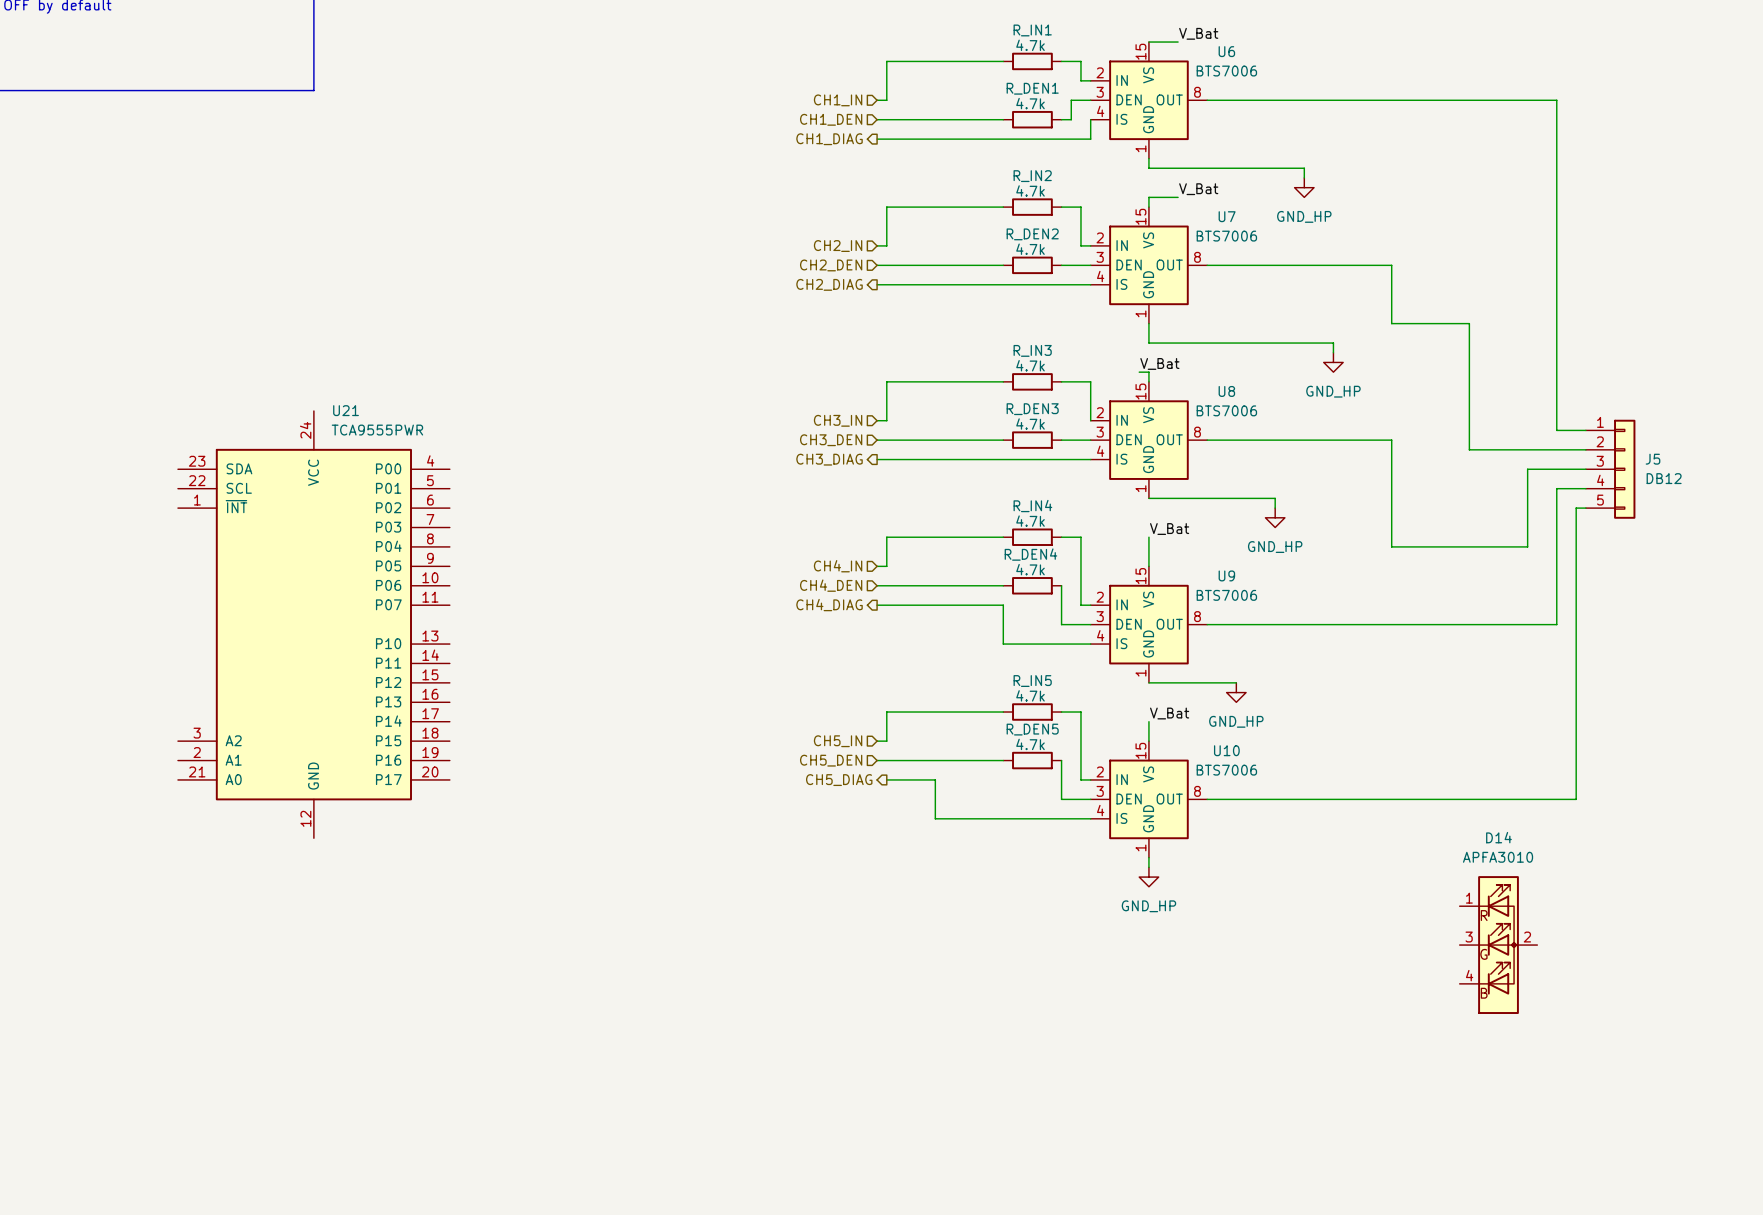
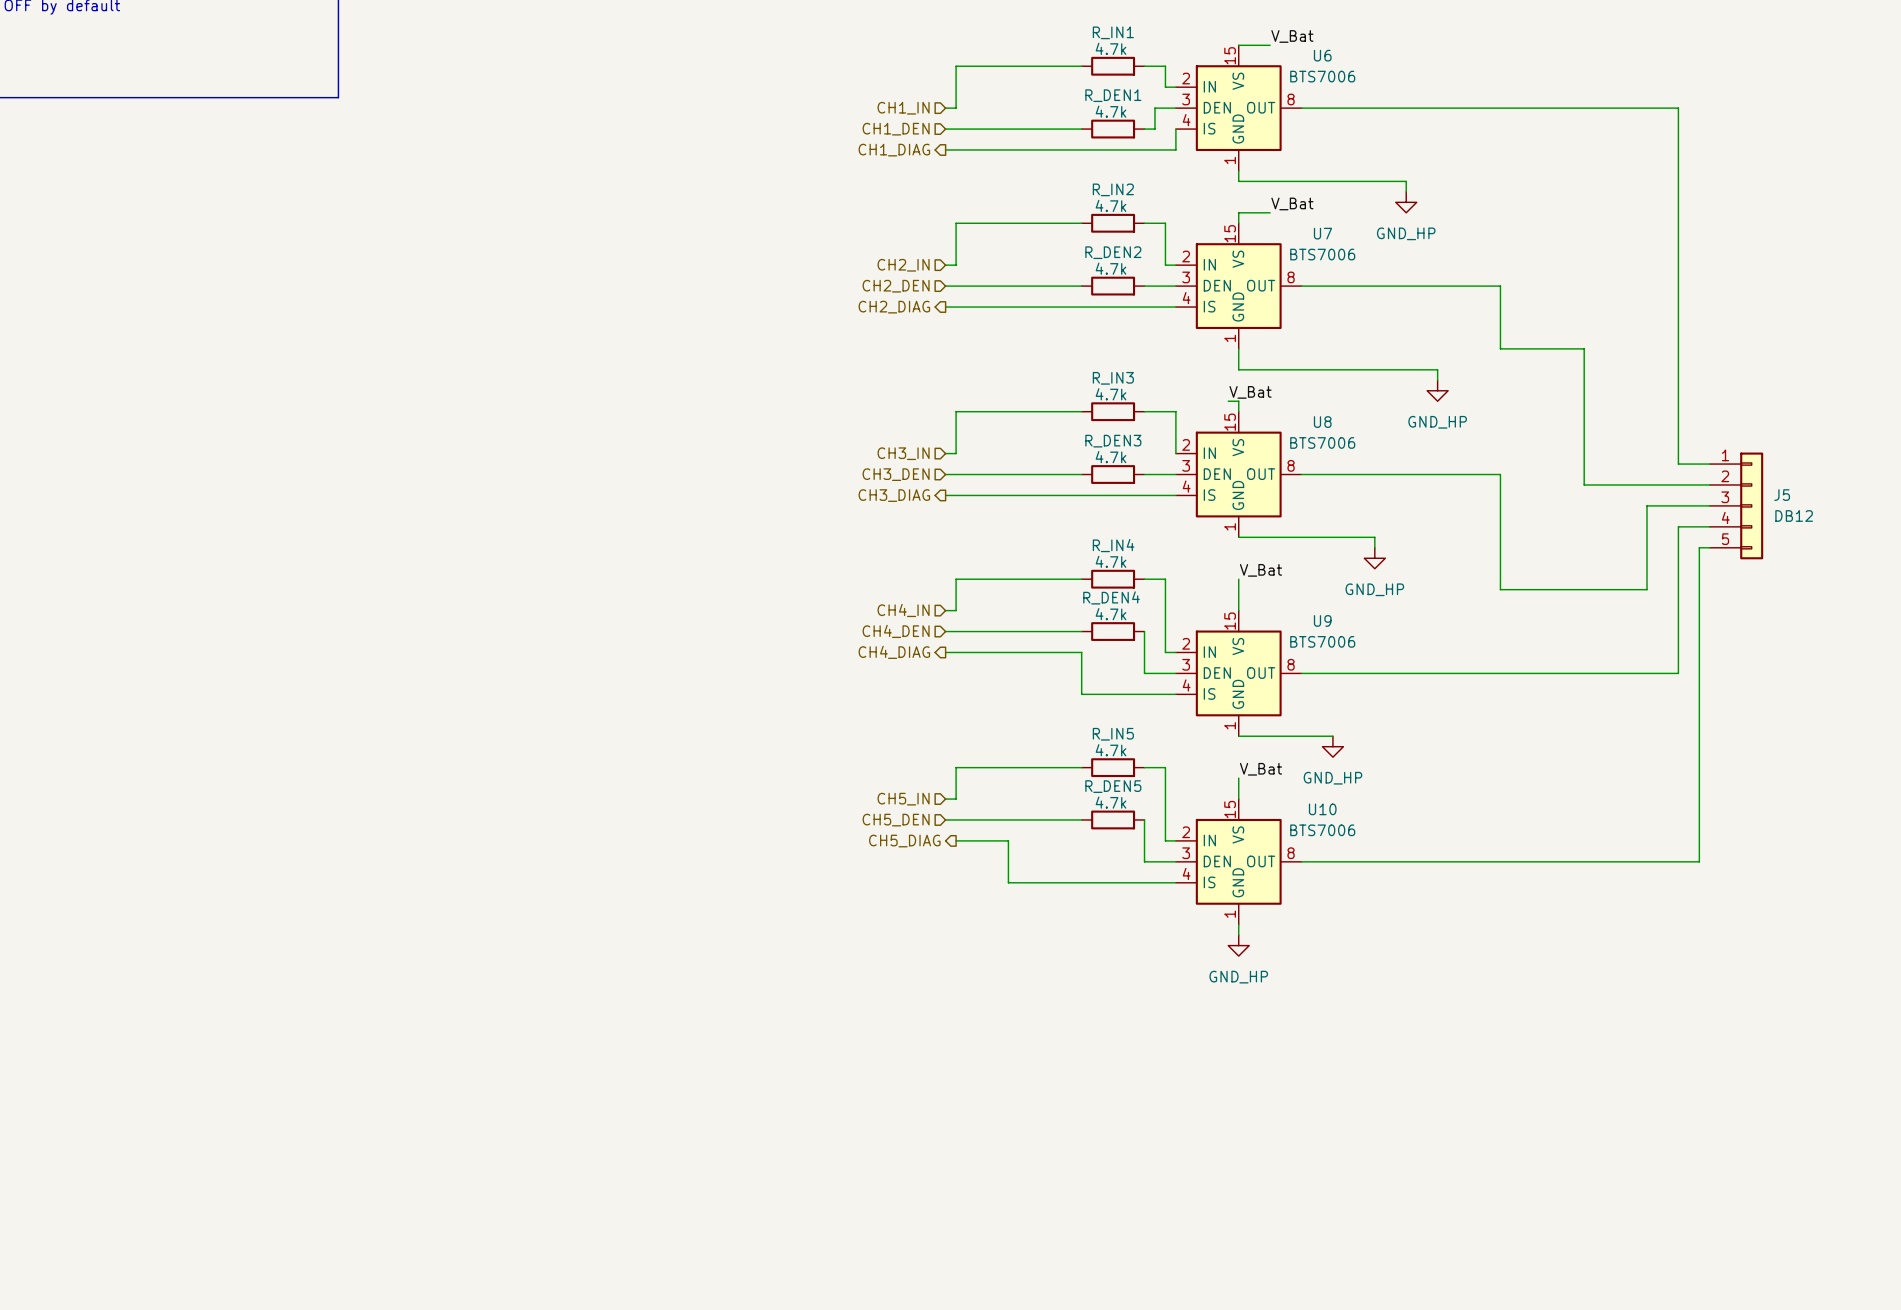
U21: TCA9555PWR (313, 624) -> none
D14: APFA3010 (1498, 945) -> none

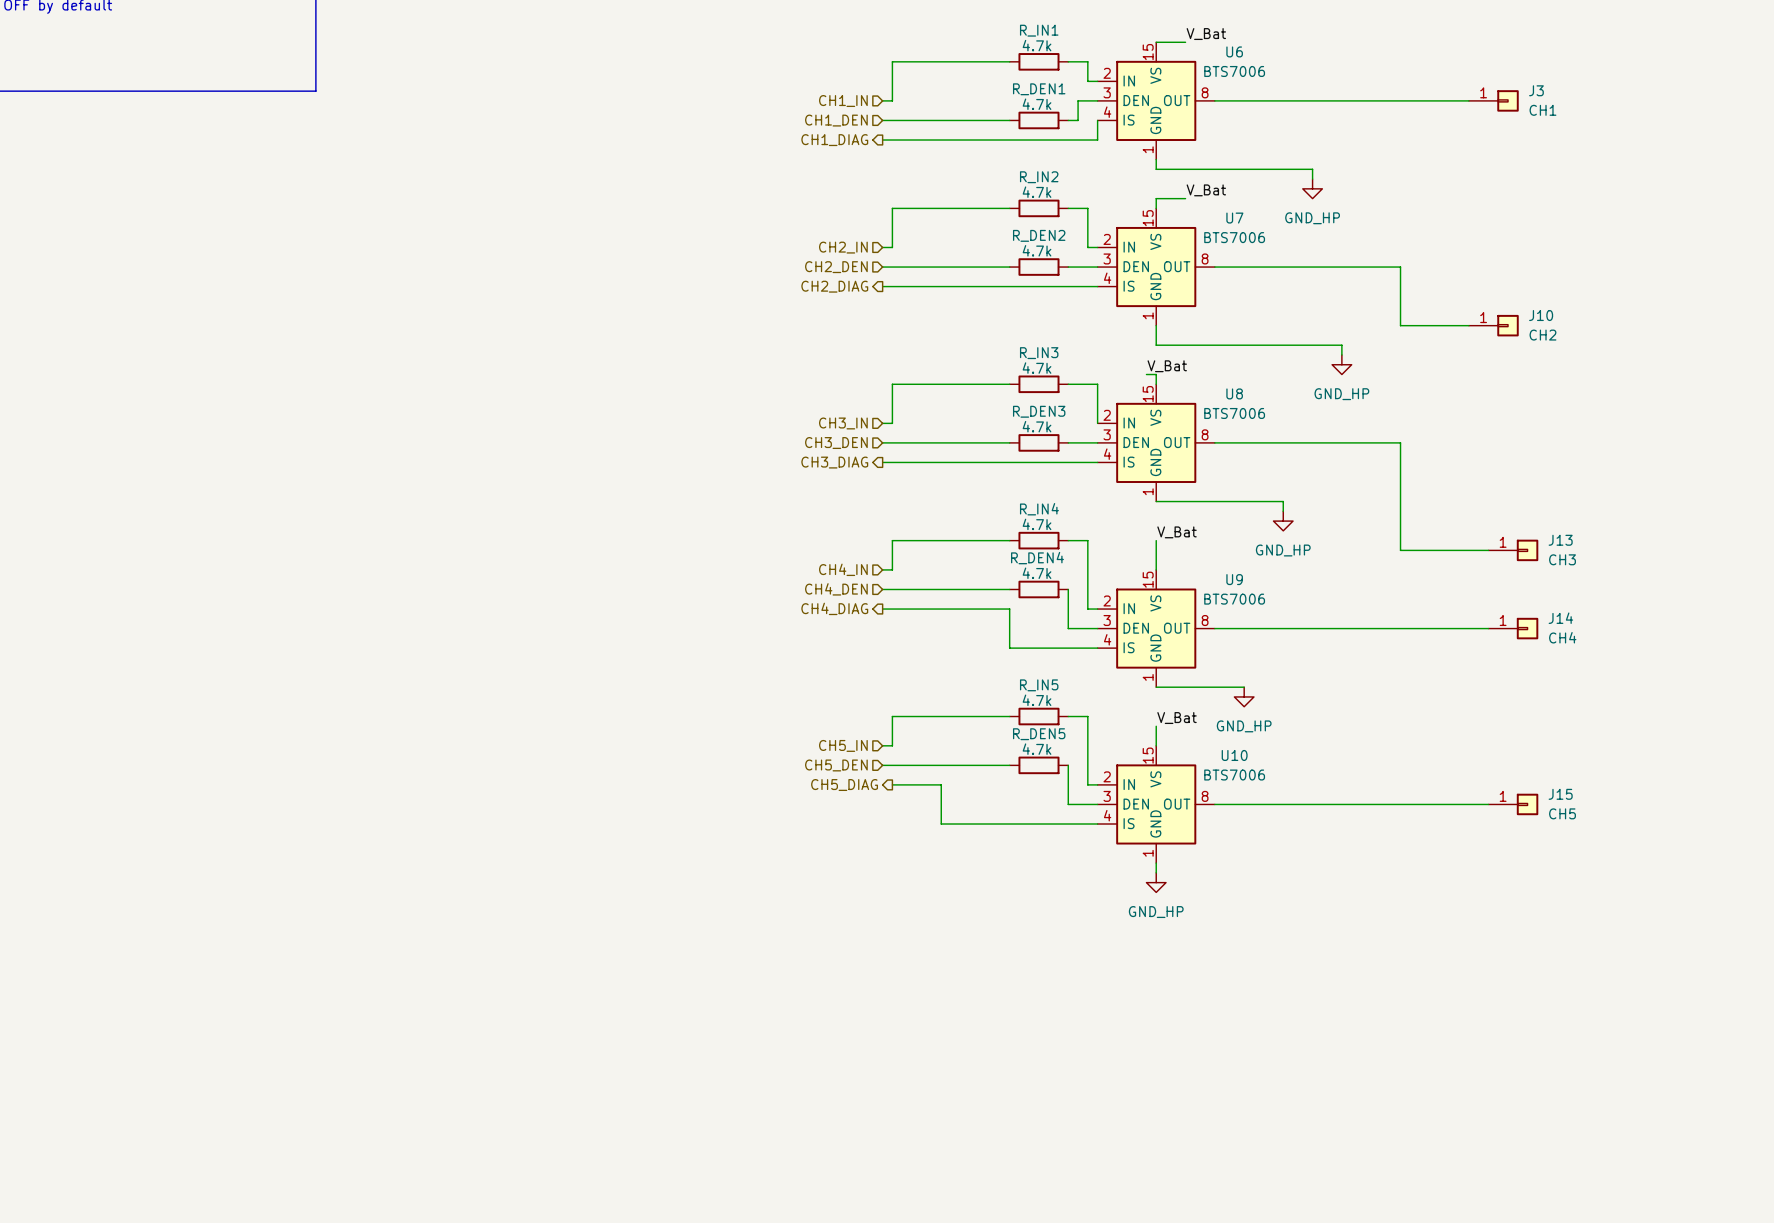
wire: (1573, 108) (1678, 108) (1678, 464) (1709, 464) -> none
J3: none -> CH1 (1493, 100)
wire: (1573, 348) (1584, 348) (1584, 484) (1709, 484) -> none
J10: none -> CH2 (1493, 325)
wire: (1709, 505) (1647, 505) (1647, 589) (1594, 589) -> none
J5: DB12 (1736, 505) -> none
wire: (1709, 526) (1678, 526) (1678, 673) (1594, 673) -> none
wire: (1709, 547) (1699, 547) (1699, 861) (1594, 861) -> none
J13: none -> CH3 (1513, 550)
J14: none -> CH4 (1513, 628)
J15: none -> CH5 (1513, 804)

